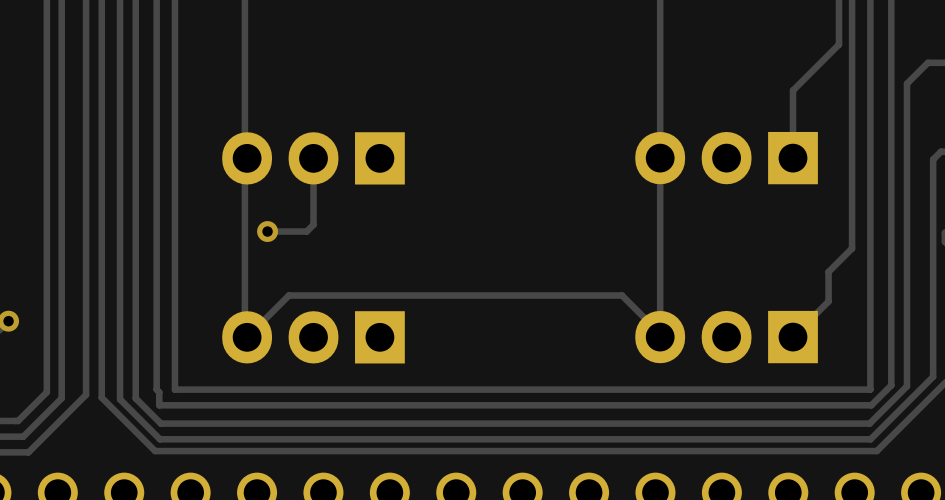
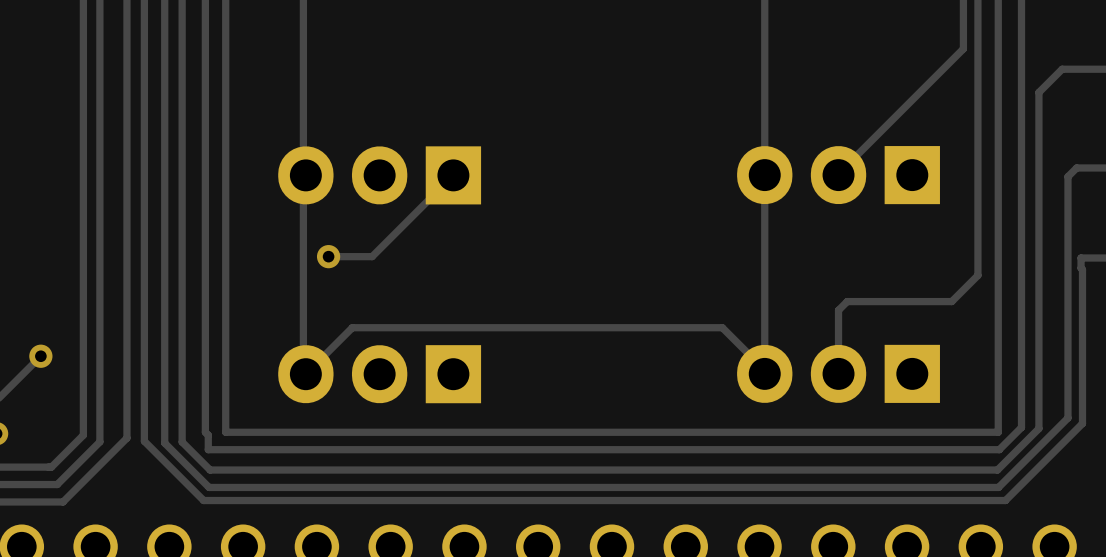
track: (793, 90) (793, 158) -> (912, 100) (838, 175)
track: (313, 158) (313, 224) -> (453, 175) (379, 249)
track: (828, 271) (828, 301) (793, 337) -> (951, 301) (847, 301) (838, 310) (838, 373)

